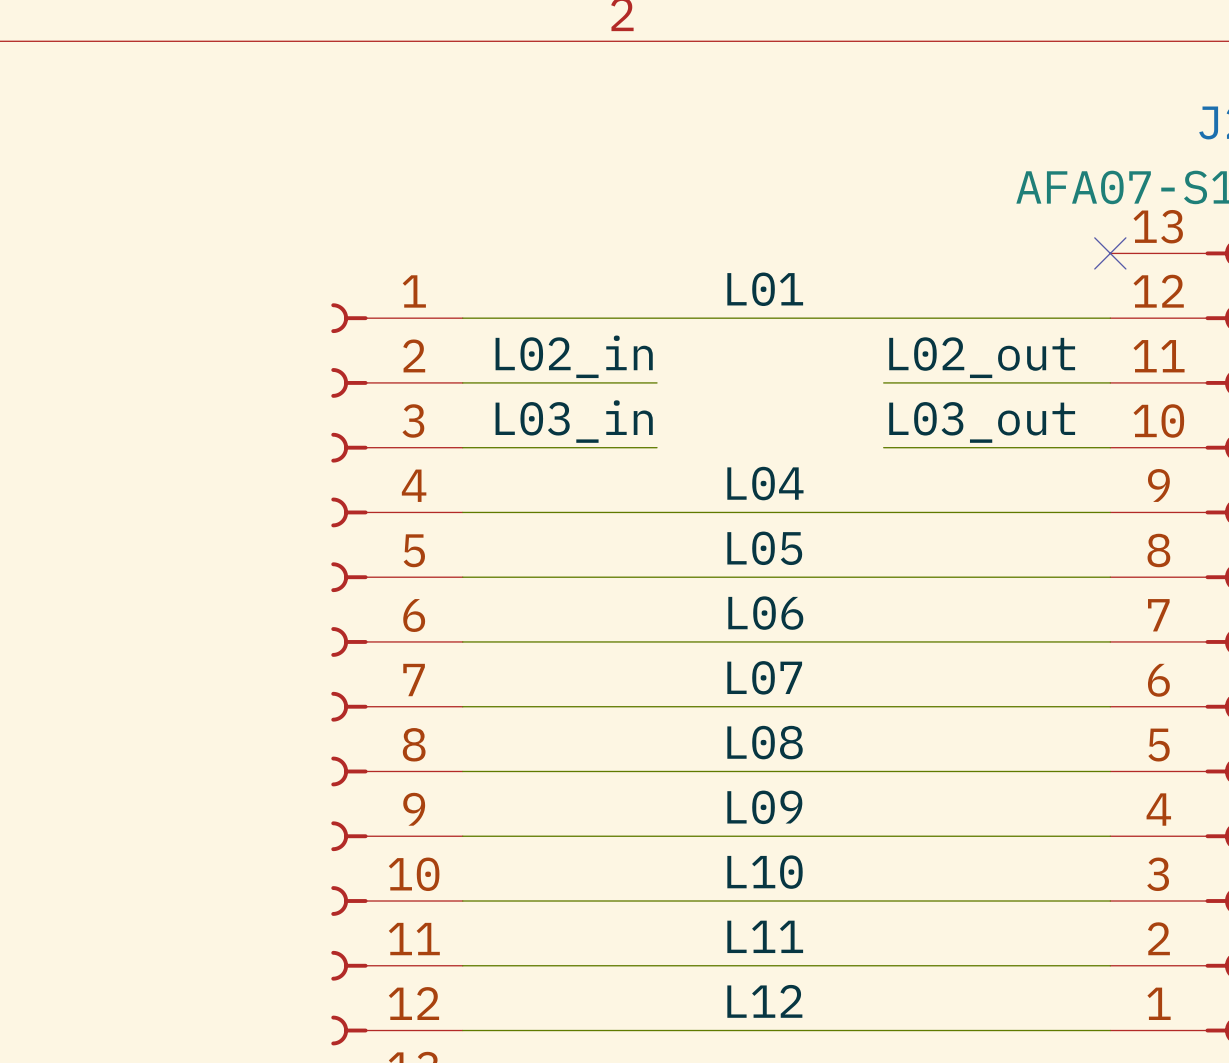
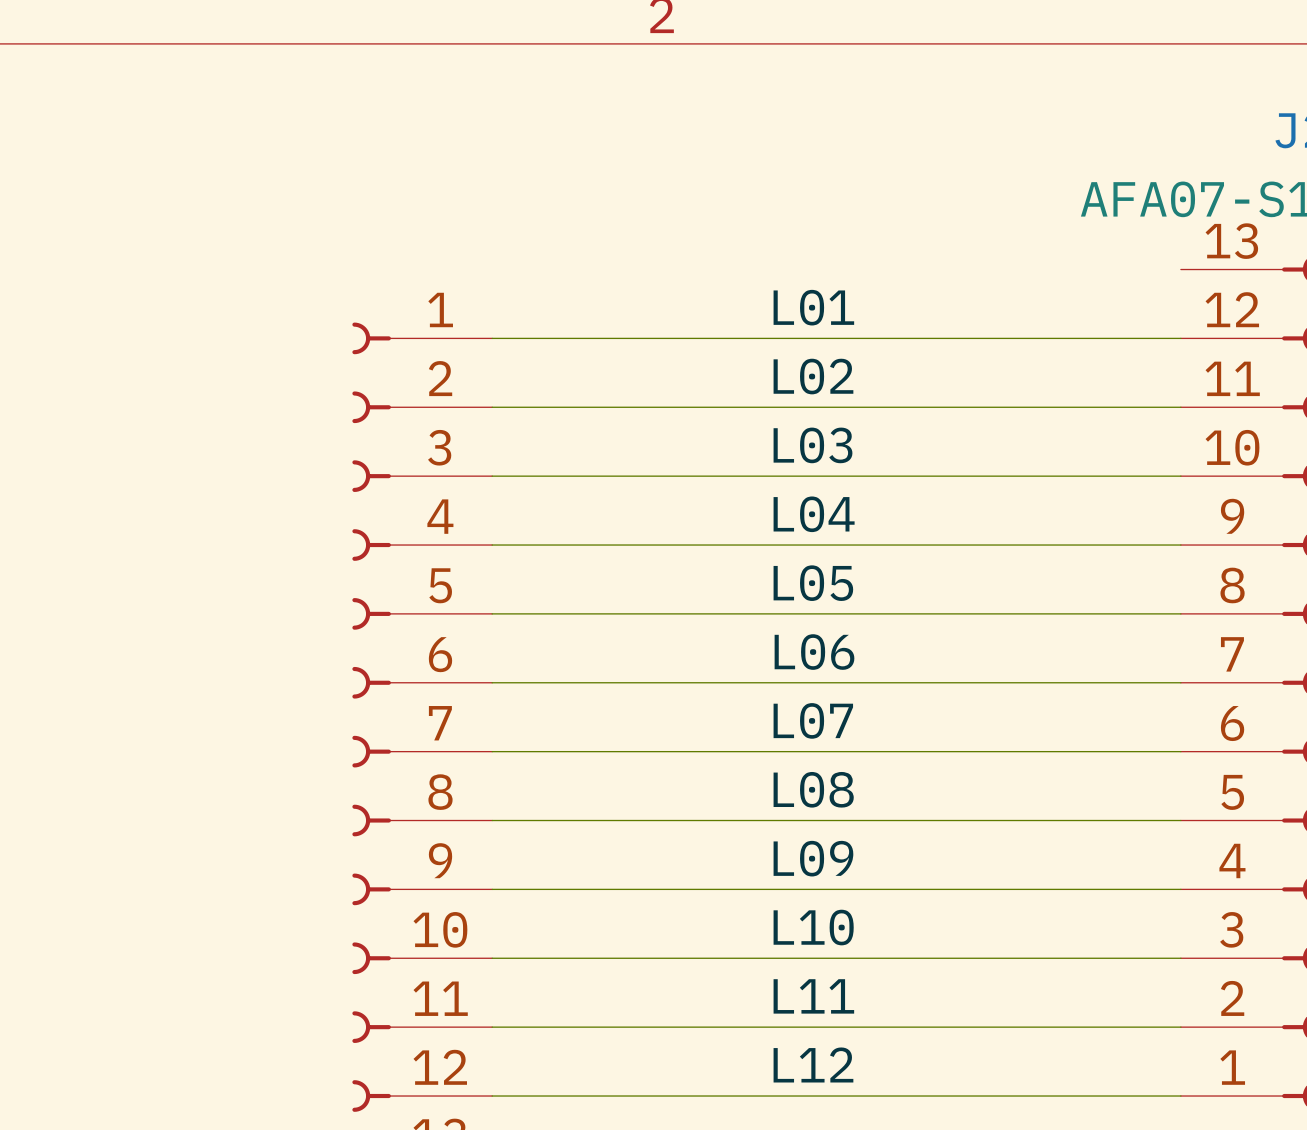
no-connect mark: (1110, 253) -> none
label: none -> L02 (813, 376)
label: L02_in (574, 356) -> none
label: L02_out (982, 357) -> none
wire: none -> (698, 407) (939, 407)
label: none -> L03 (812, 445)
label: L03_in (574, 421) -> none
label: L03_out (982, 422) -> none
wire: none -> (698, 476) (939, 476)

